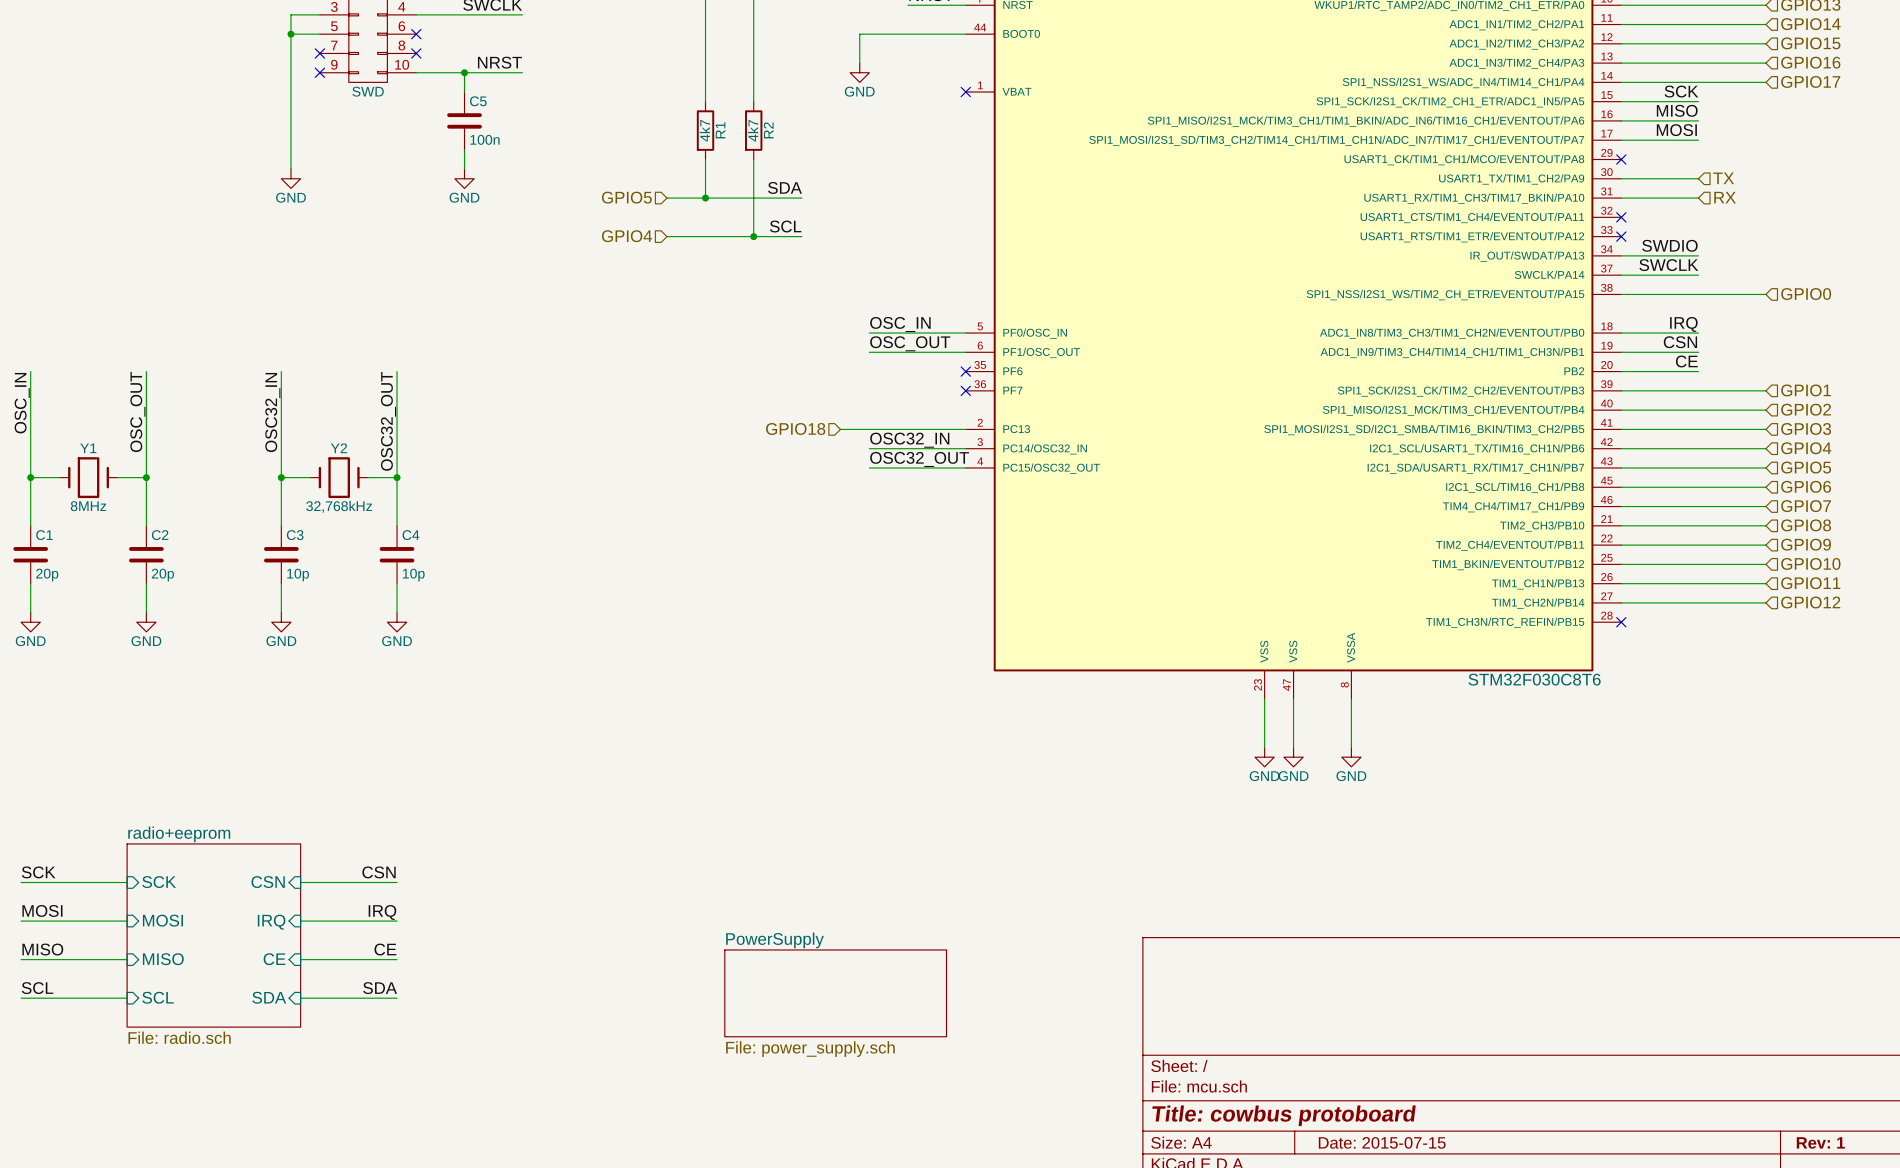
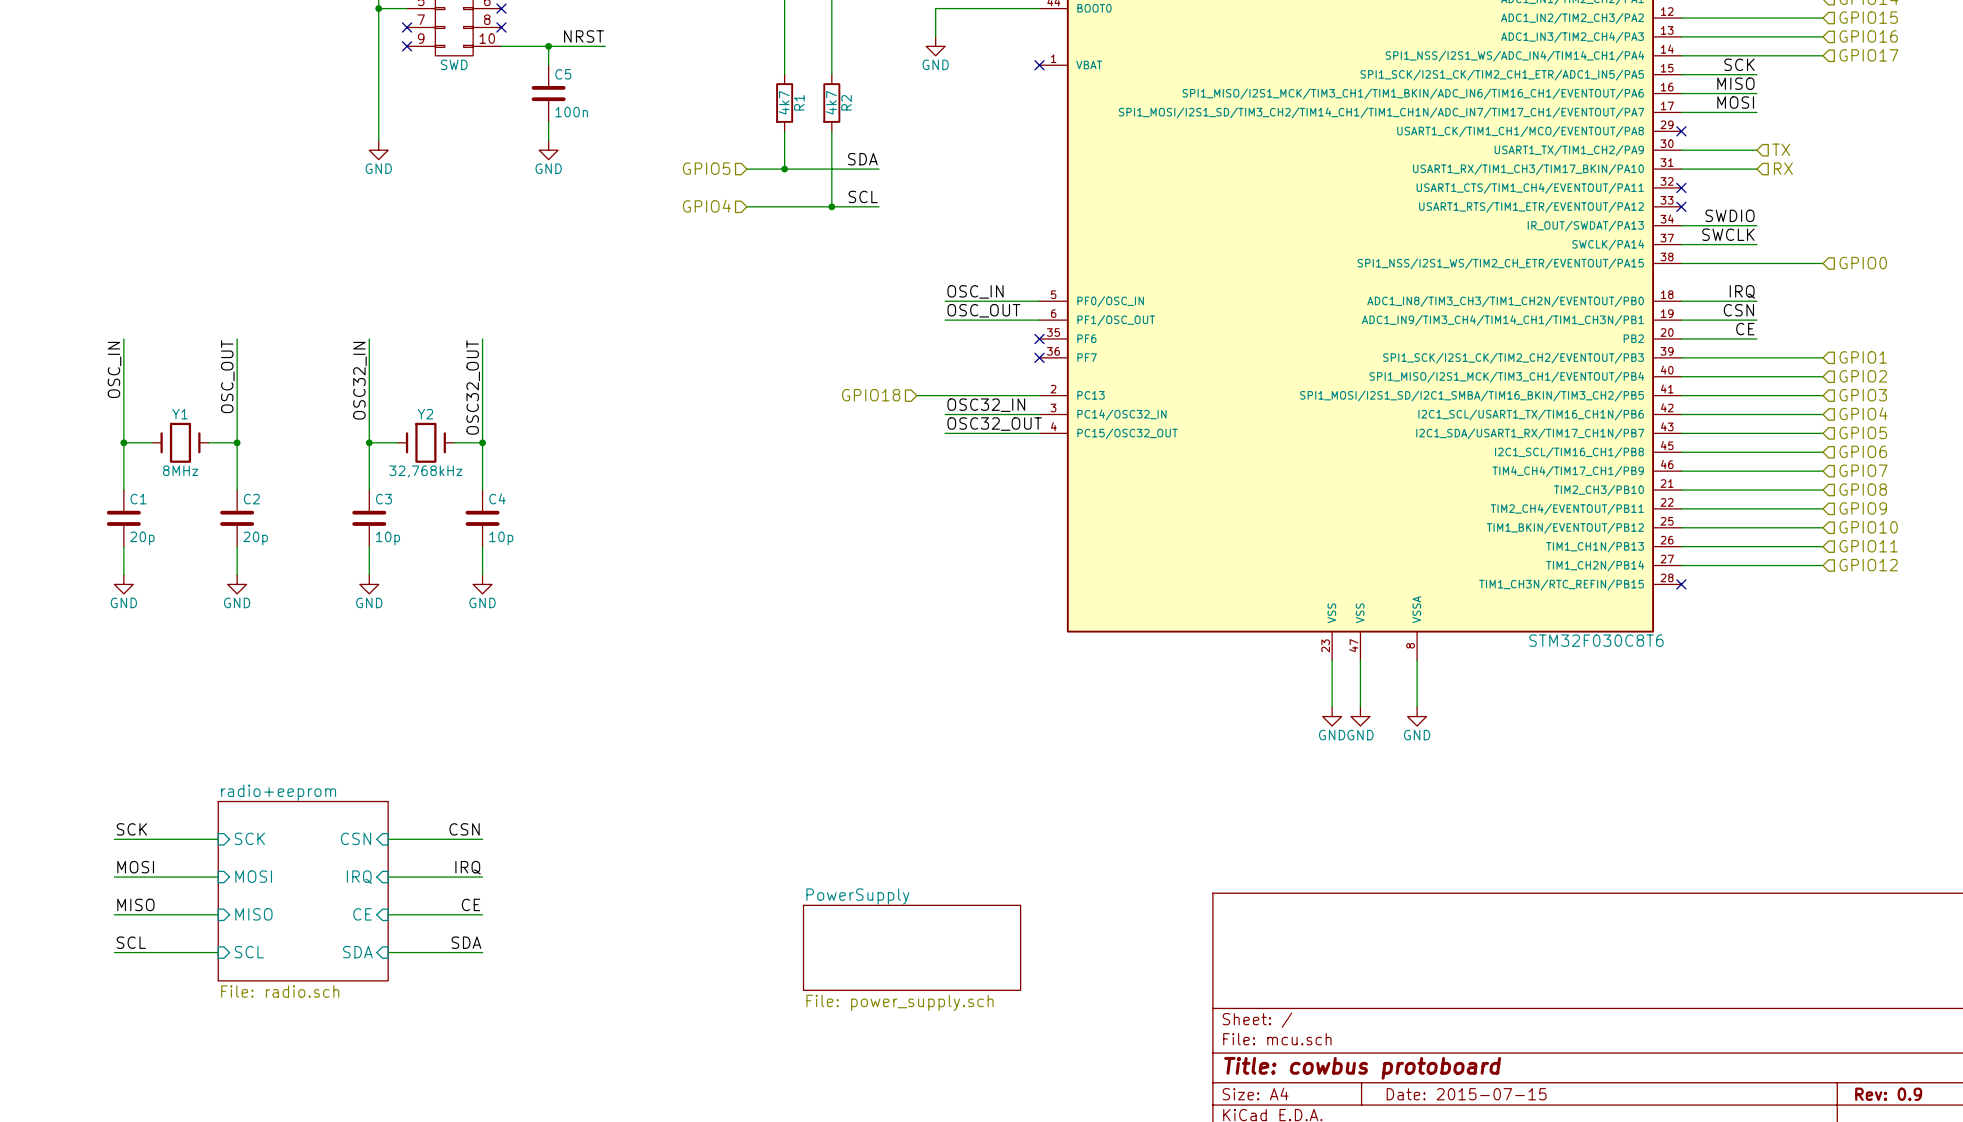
title block: Rev: 1 (1820, 1142) -> Rev: 0.9 (1888, 1094)

